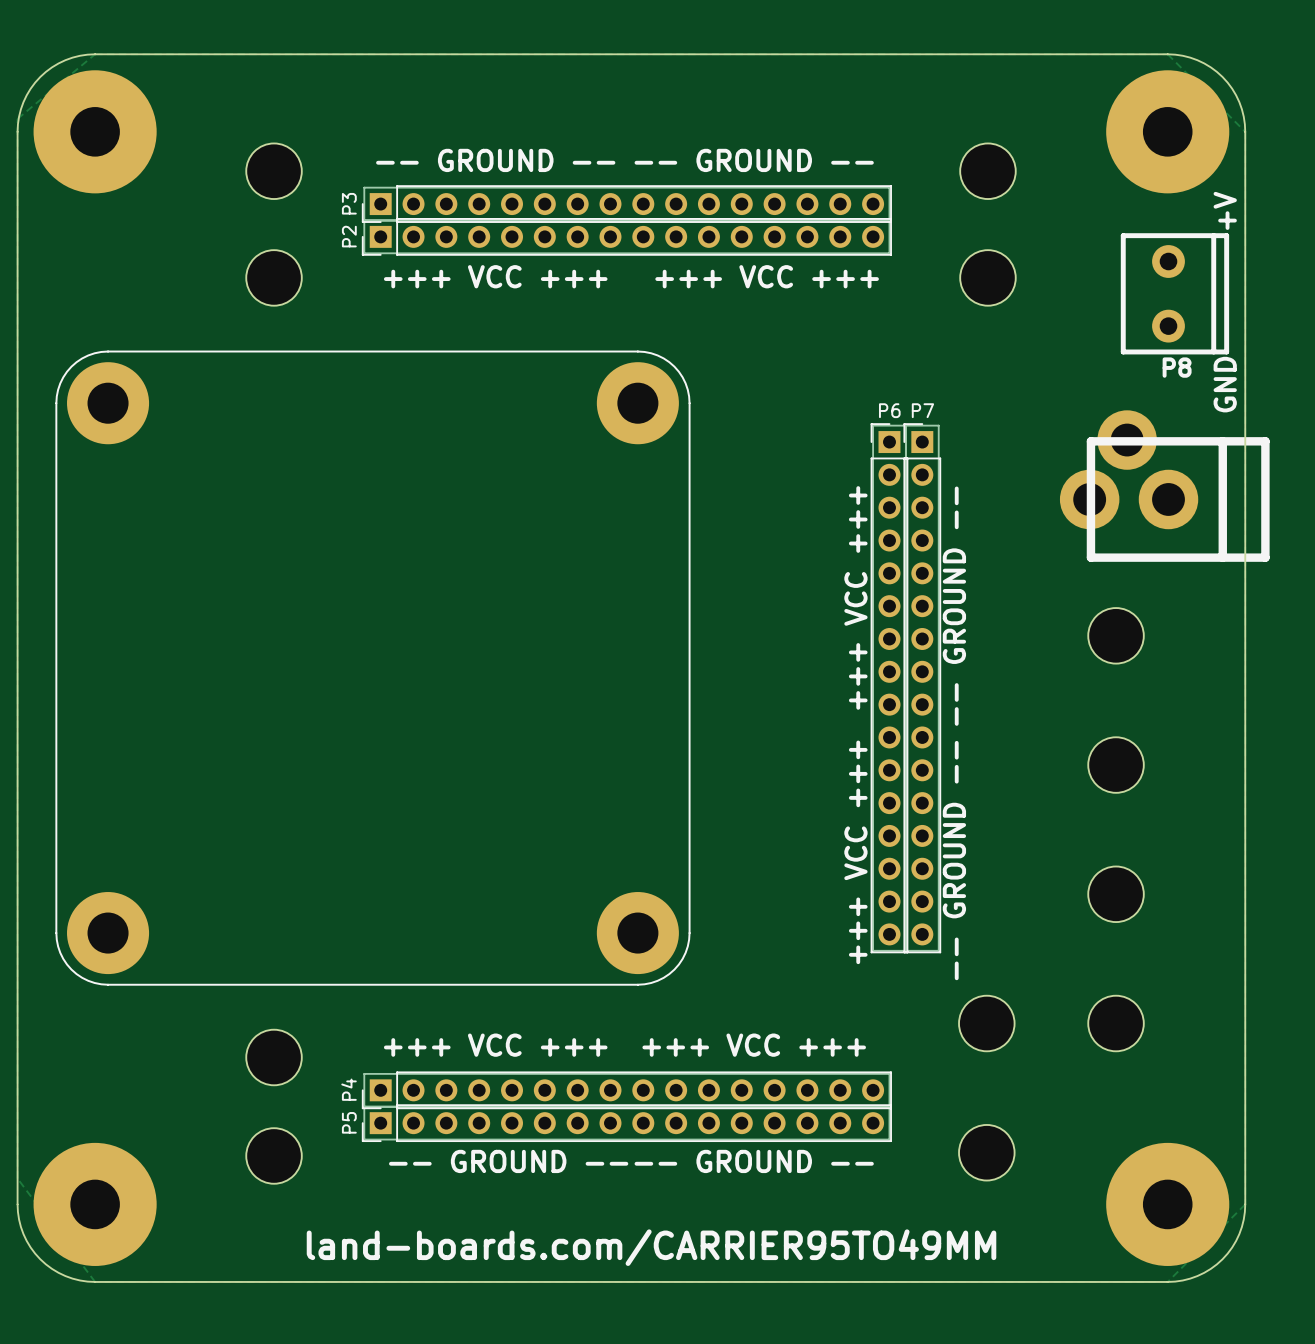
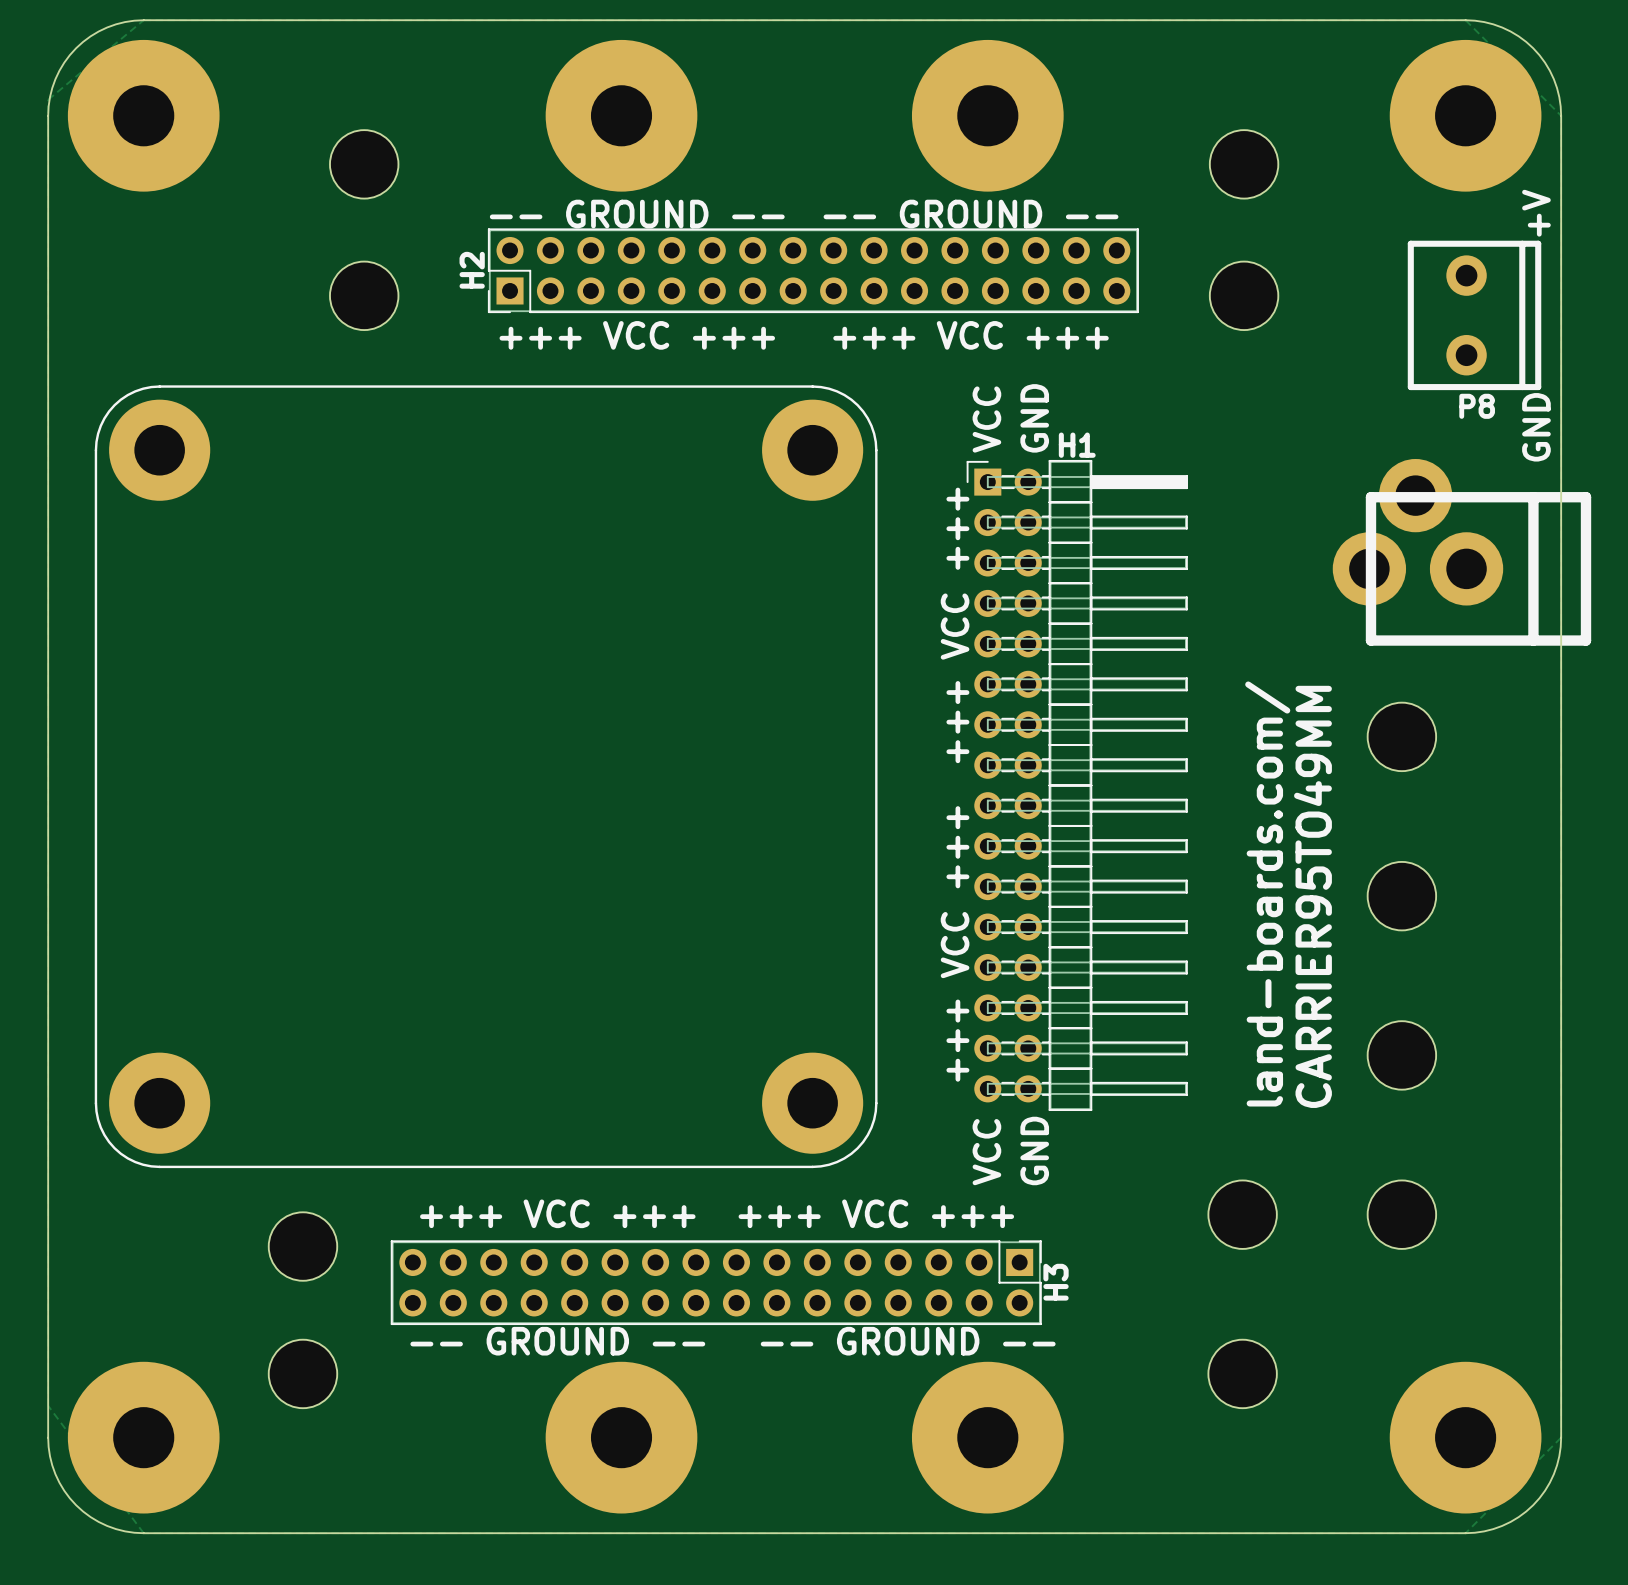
part: none -> (621, 115)
part: none -> (987, 115)
text position: -- GROUND -- (495, 160) -> -- GROUND -- (637, 214)
text position: -- GROUND -- (754, 160) -> -- GROUND -- (971, 214)
P3: (626, 204) -> none
P2: (626, 236) -> none
H2: none -> (813, 270)
text position: +++ VCC +++ (495, 276) -> +++ VCC +++ (637, 335)
text position: +++ VCC +++ (767, 276) -> +++ VCC +++ (971, 335)
text: none -> GND (1034, 418)
text: none -> VCC (986, 419)
text: none -> +++ VCC +++ (955, 625)
text: +++ VCC +++ (855, 597) -> none
text: -- GROUND -- (954, 606) -> none
H1: none -> (1077, 785)
P6: (889, 688) -> none
P7: (922, 688) -> none
text: none -> land-boards.com/ (1267, 893)
text: none -> CARRIER95TO49MM (1312, 896)
text position: +++ VCC +++ (855, 852) -> +++ VCC +++ (955, 943)
text: -- GROUND -- (954, 860) -> none
text: none -> GND (1034, 1150)
text: none -> VCC (986, 1152)
text position: +++ VCC +++ (495, 1045) -> +++ VCC +++ (557, 1213)
text position: +++ VCC +++ (754, 1045) -> +++ VCC +++ (876, 1213)
part position: (274, 1057) -> (302, 1246)
H3: none -> (716, 1282)
P4: (626, 1090) -> none
P5: (626, 1123) -> none
part position: (274, 1155) -> (302, 1373)
text position: -- GROUND -- (508, 1161) -> -- GROUND -- (557, 1341)
text position: -- GROUND -- (754, 1161) -> -- GROUND -- (908, 1341)
part: none -> (621, 1437)
part: none -> (987, 1437)
text: land-boards.com/CARRIER95TO49MM (651, 1247) -> none

